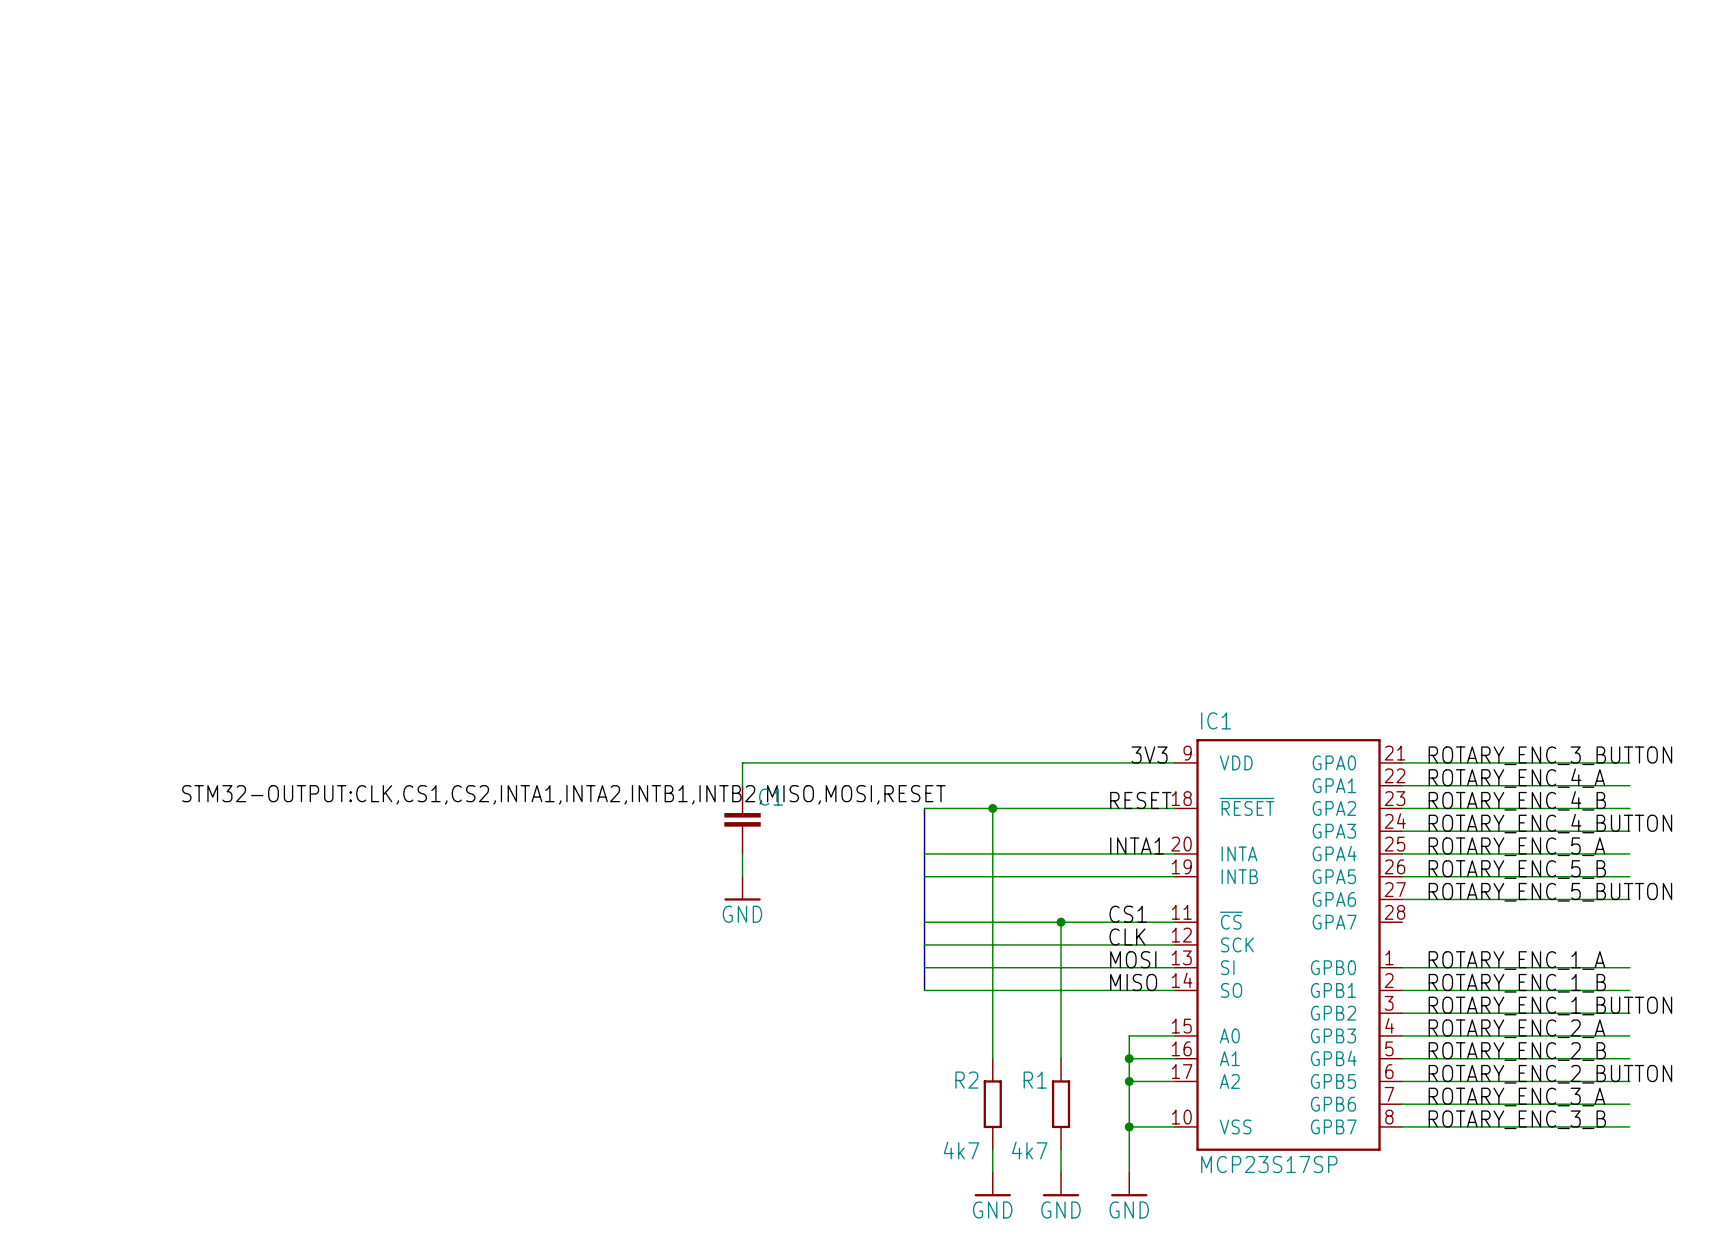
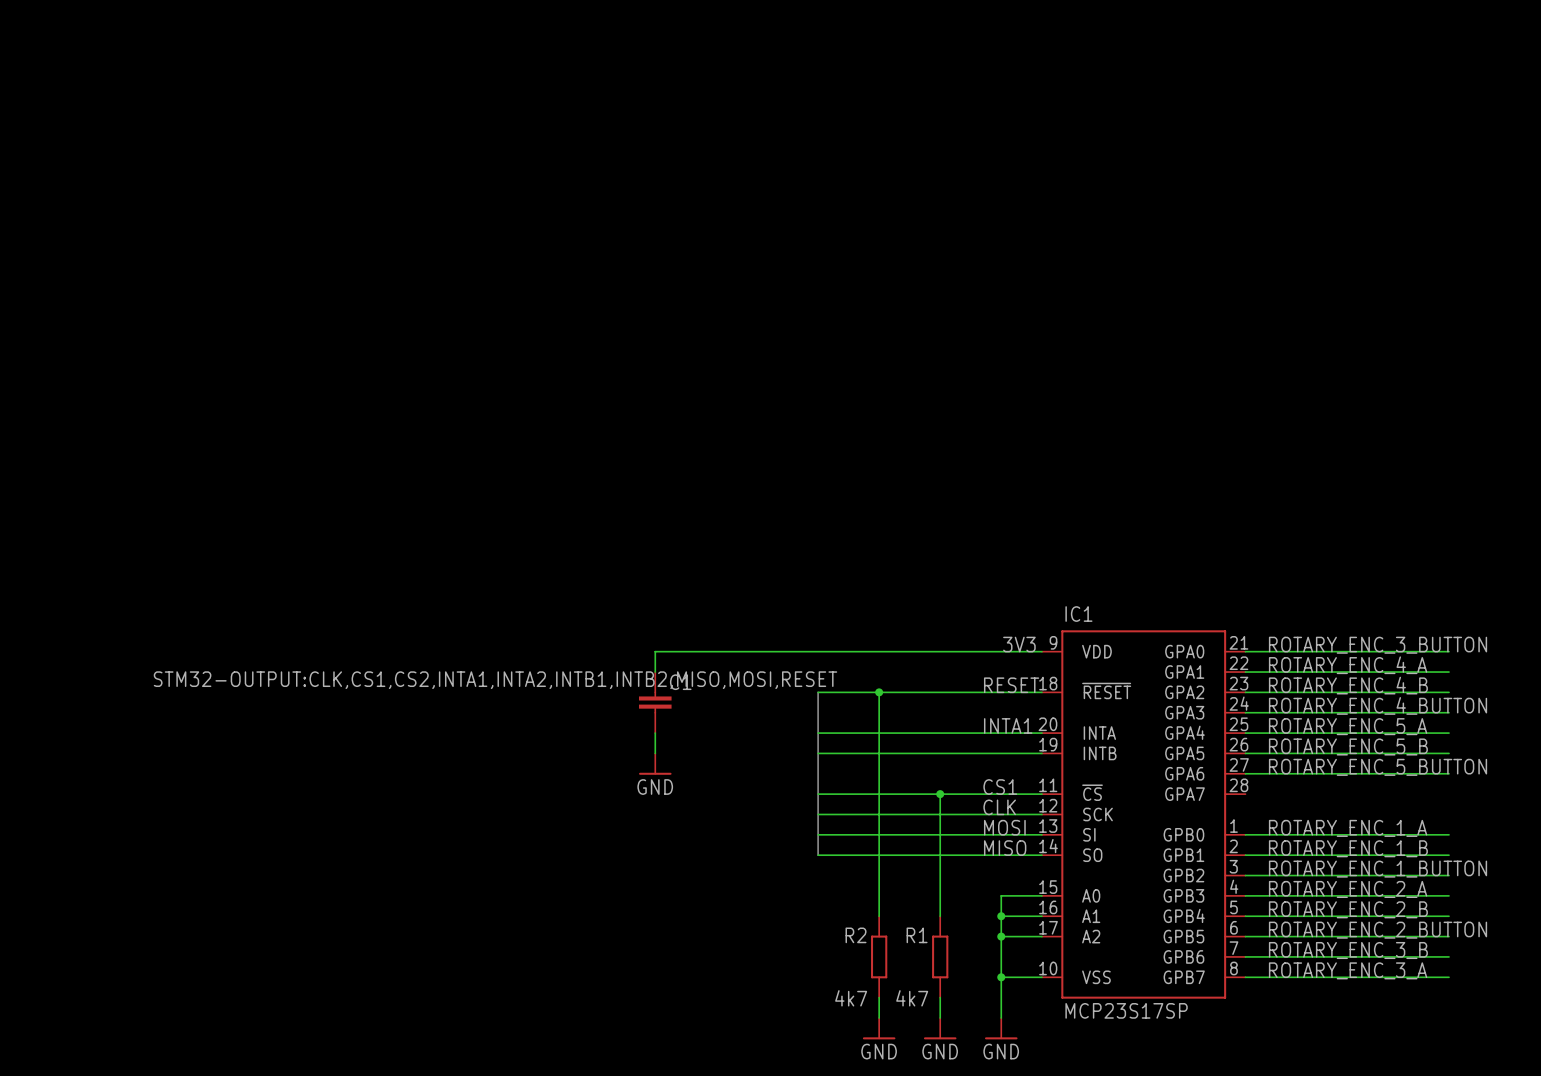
label: ROTARY_ENC_3_A (1516, 1097) -> ROTARY_ENC_3_B (1348, 950)
label: ROTARY_ENC_3_B (1517, 1119) -> ROTARY_ENC_3_A (1348, 970)

